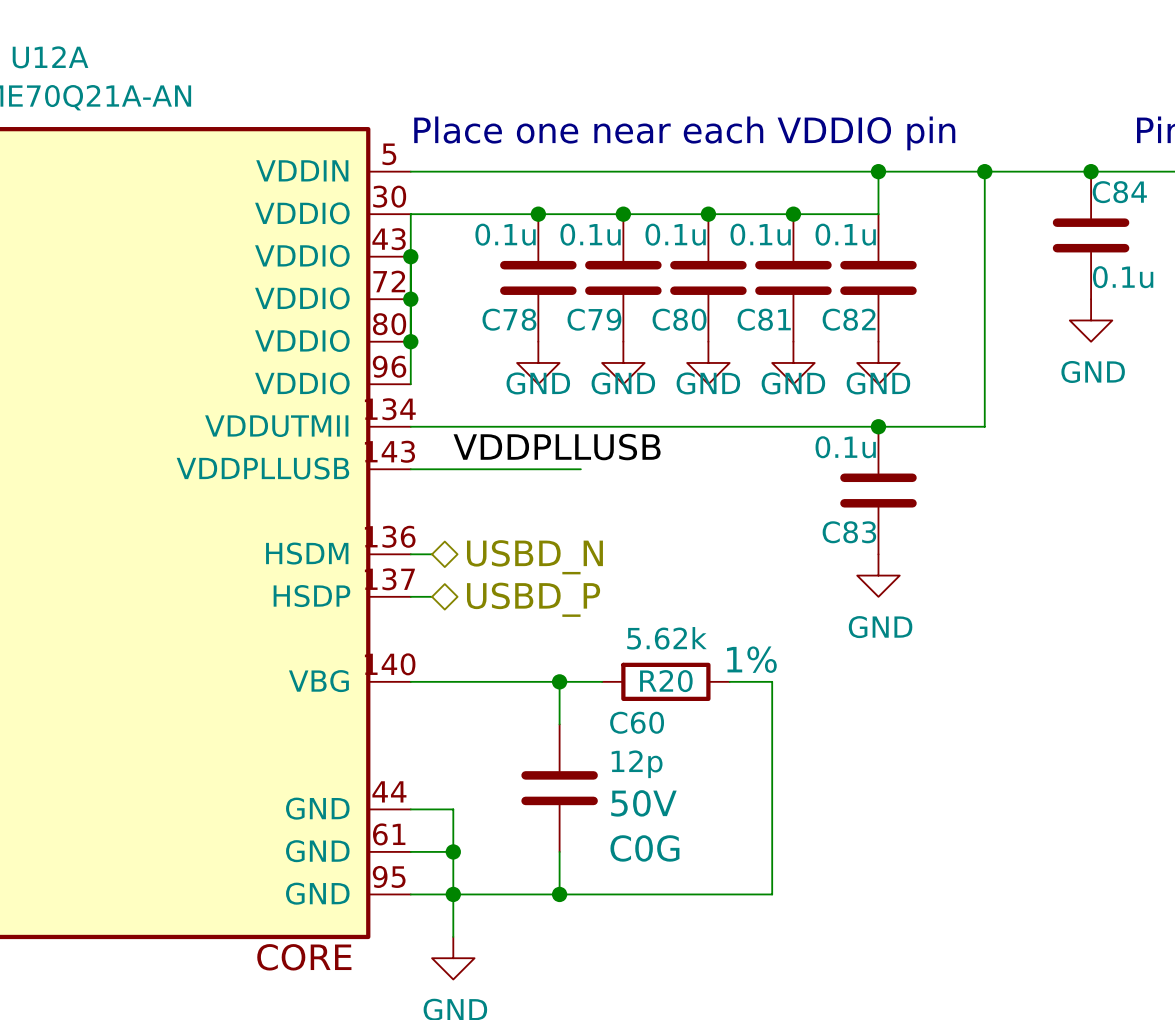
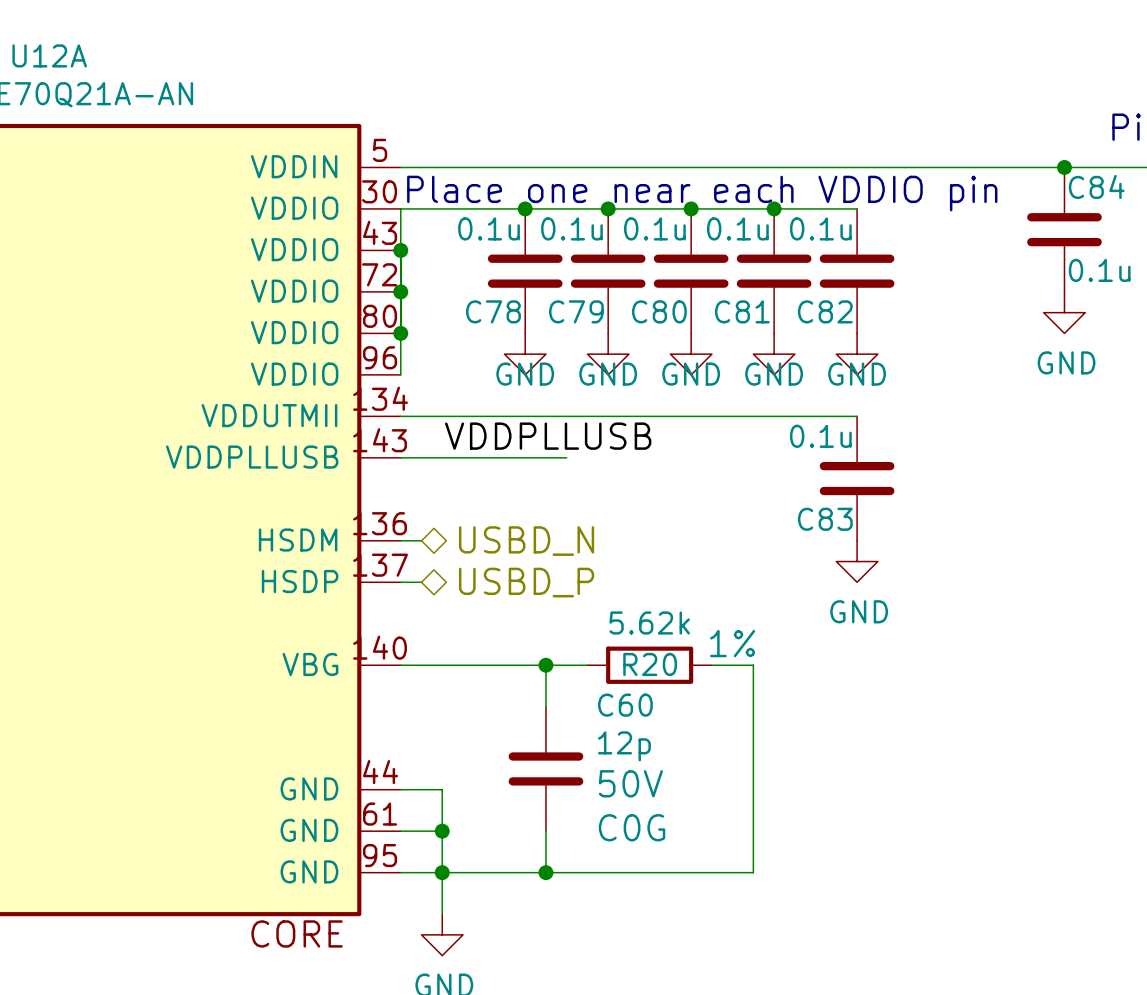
text position: Place one near each VDDIO pin (684, 133) -> Place one near each VDDIO pin (702, 193)
wire: (878, 171) (878, 214) -> none
junction: (878, 171) -> none
wire: (984, 171) (984, 426) (878, 426) -> none
junction: (984, 171) -> none
junction: (878, 426) -> none

